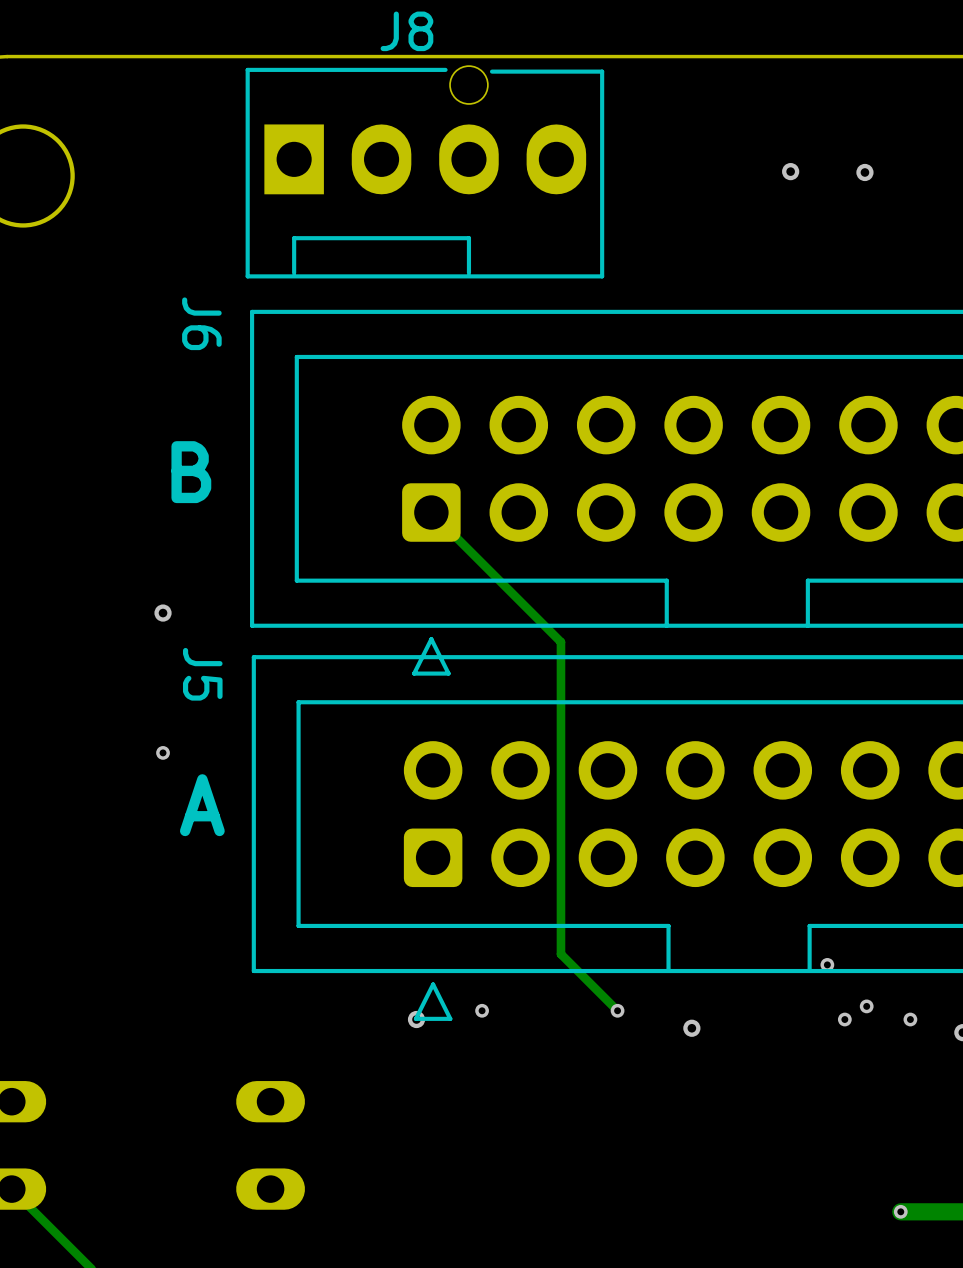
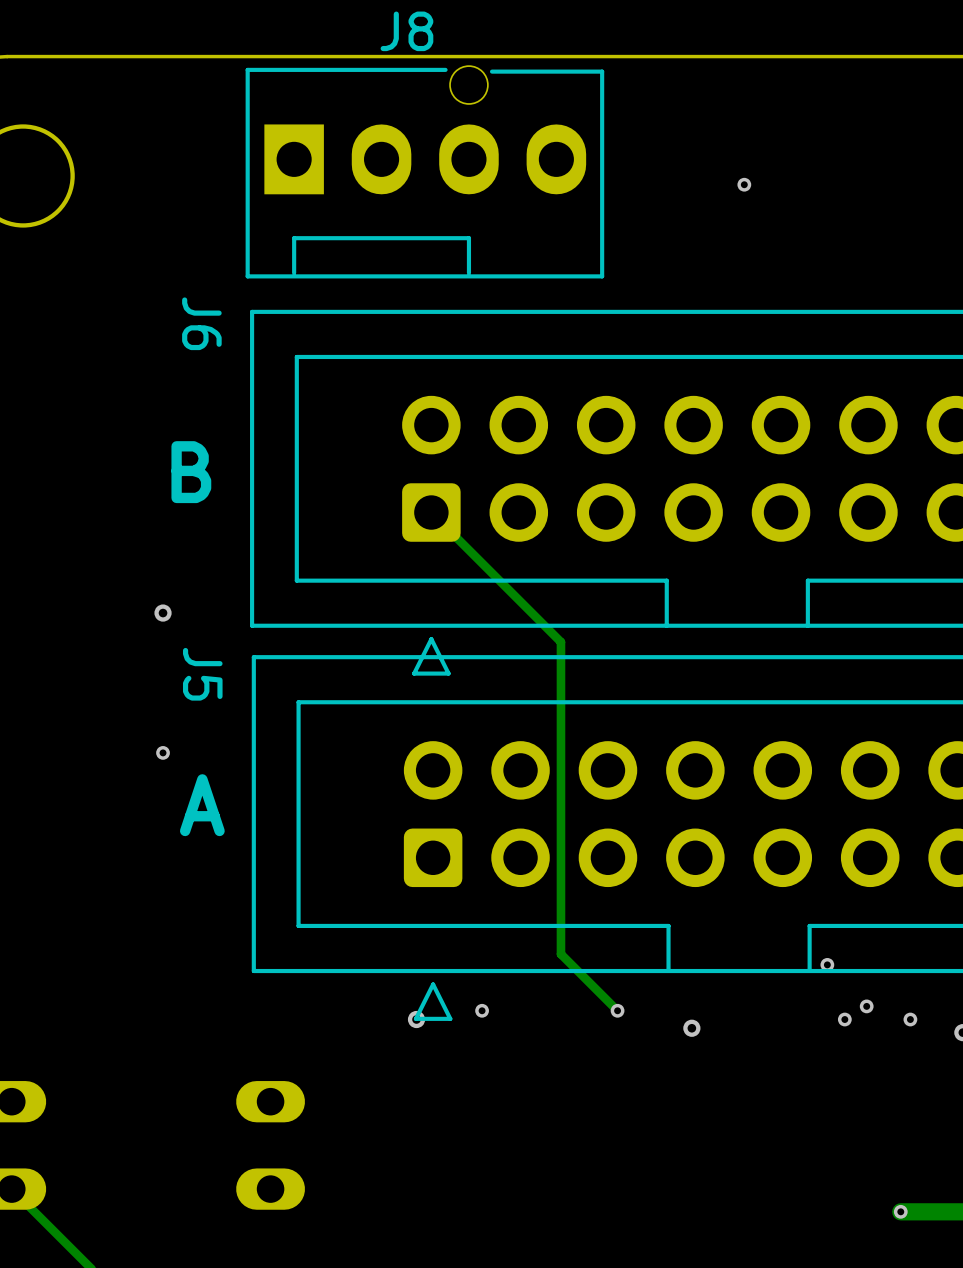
via: (790, 171) -> none
via: (864, 172) -> none
via: none -> (744, 184)

